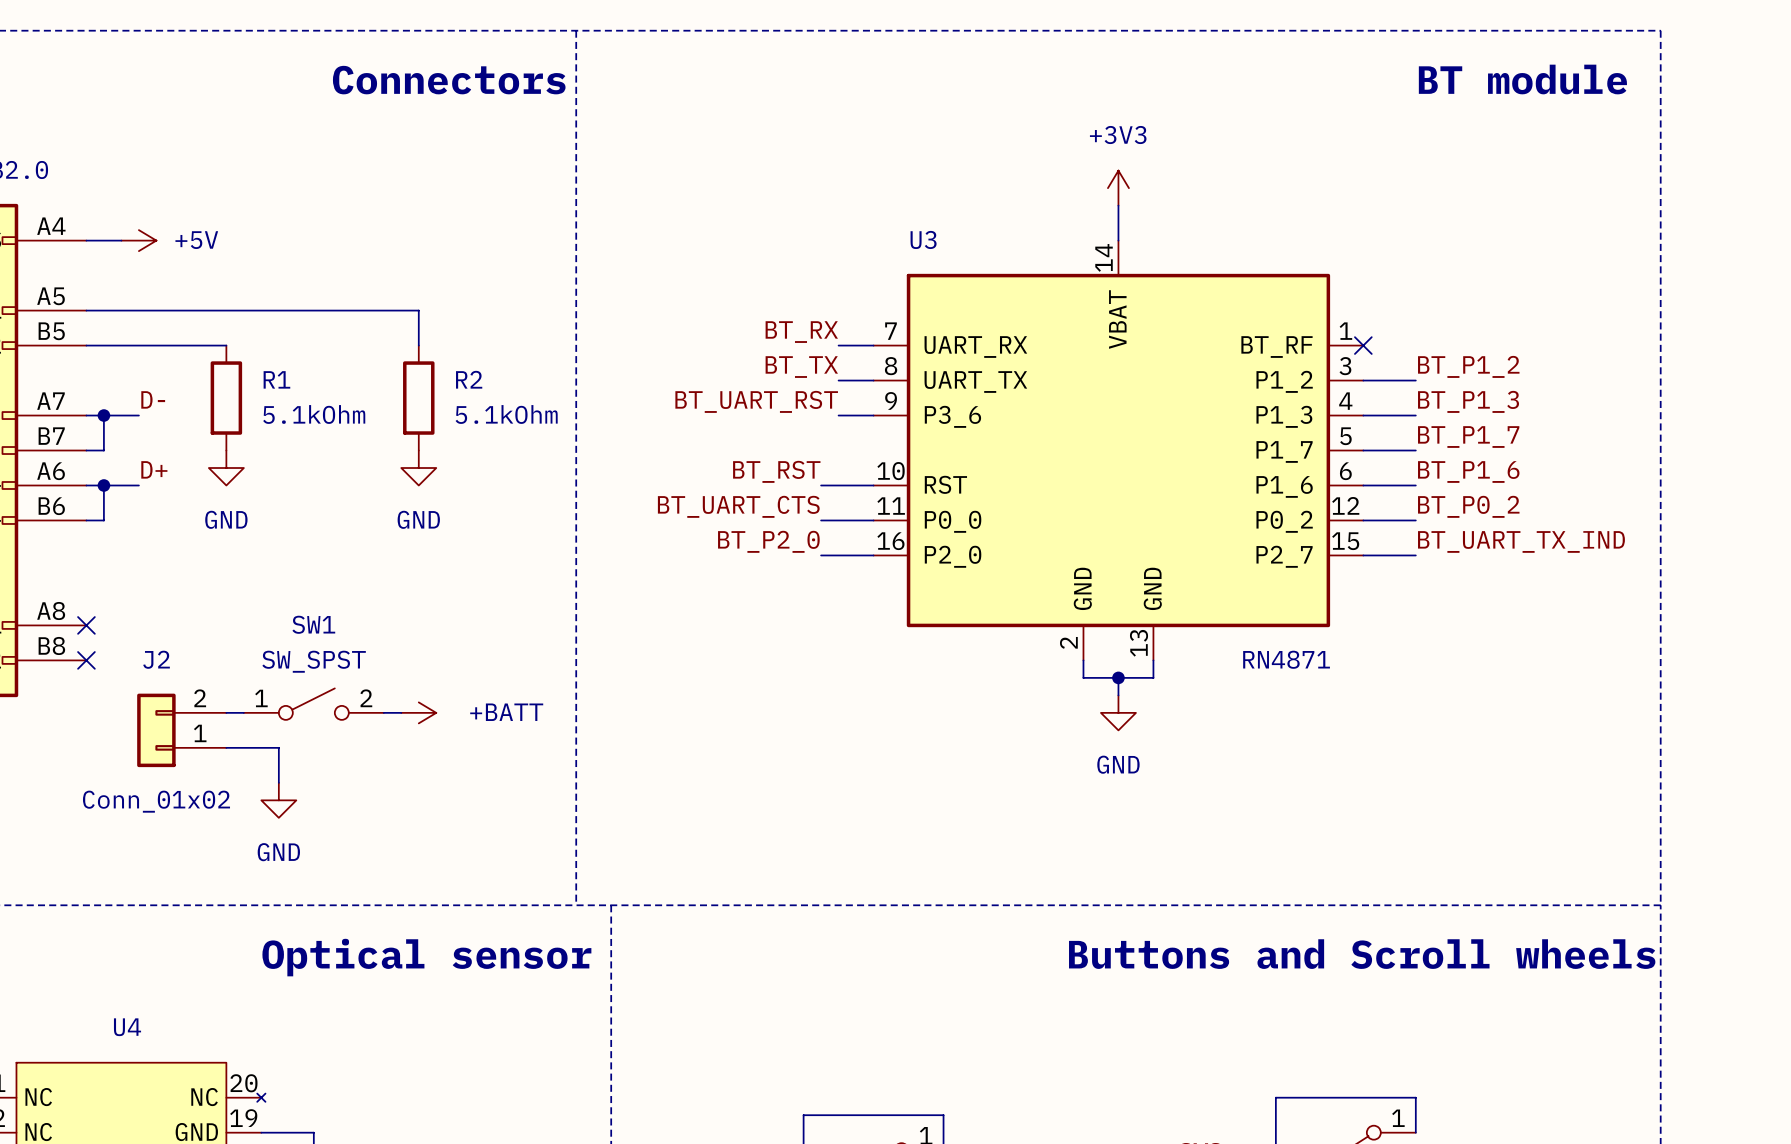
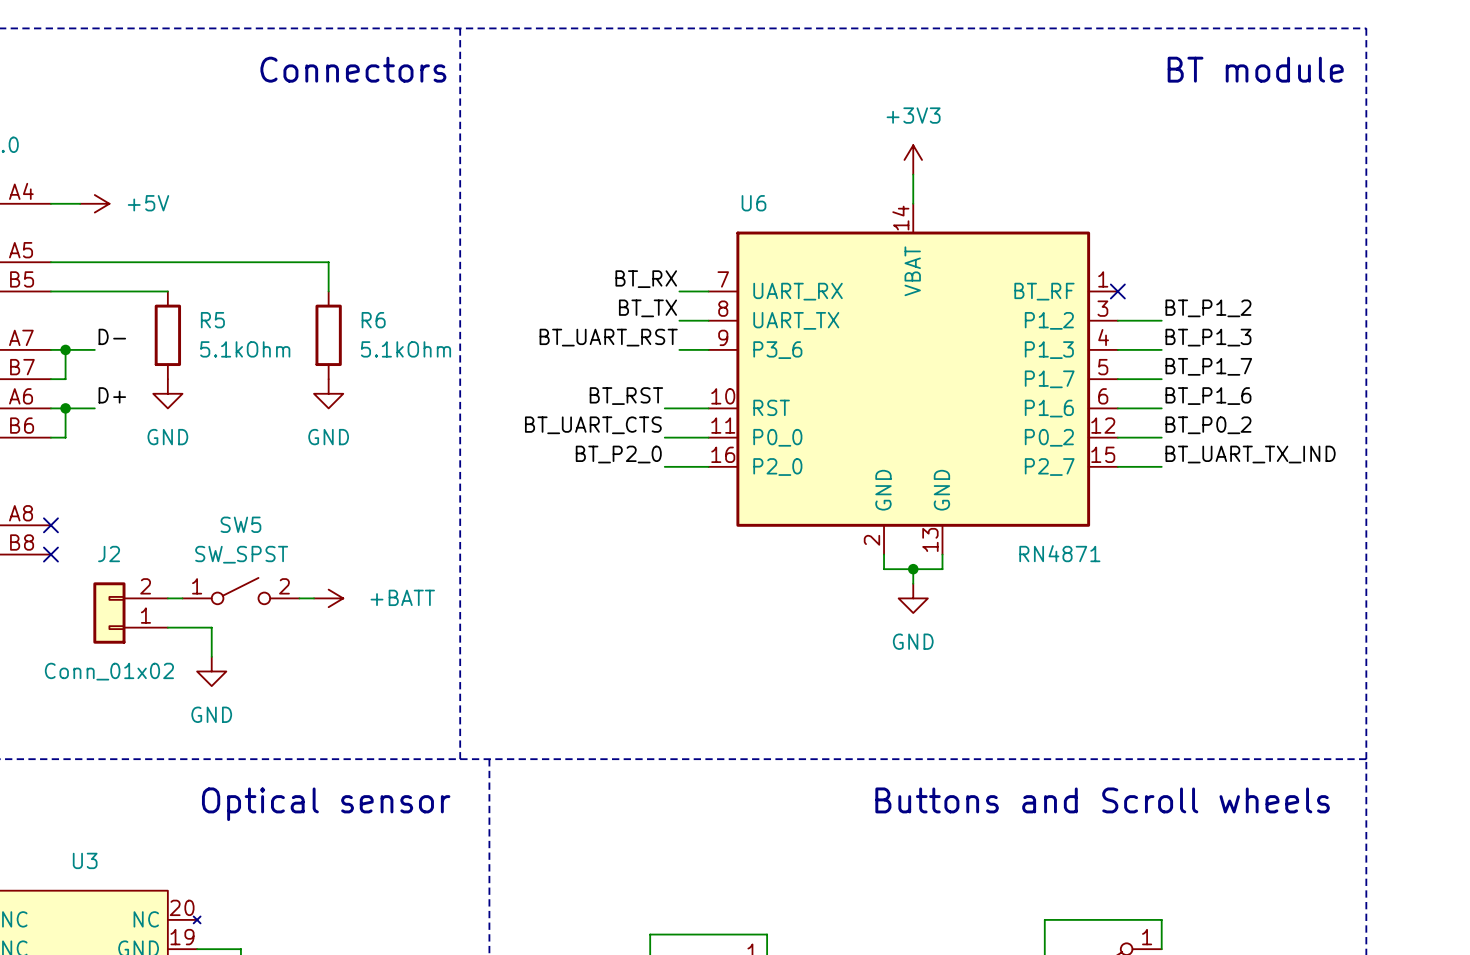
U3 name: U3 (923, 239) -> U6 (753, 203)
R1 name: R1 (276, 379) -> R5 (212, 320)
R2 name: R2 (469, 379) -> R6 (373, 320)
SW1 name: SW1 (313, 624) -> SW5 (240, 524)
U4 name: U4 (127, 1027) -> U3 (85, 860)

